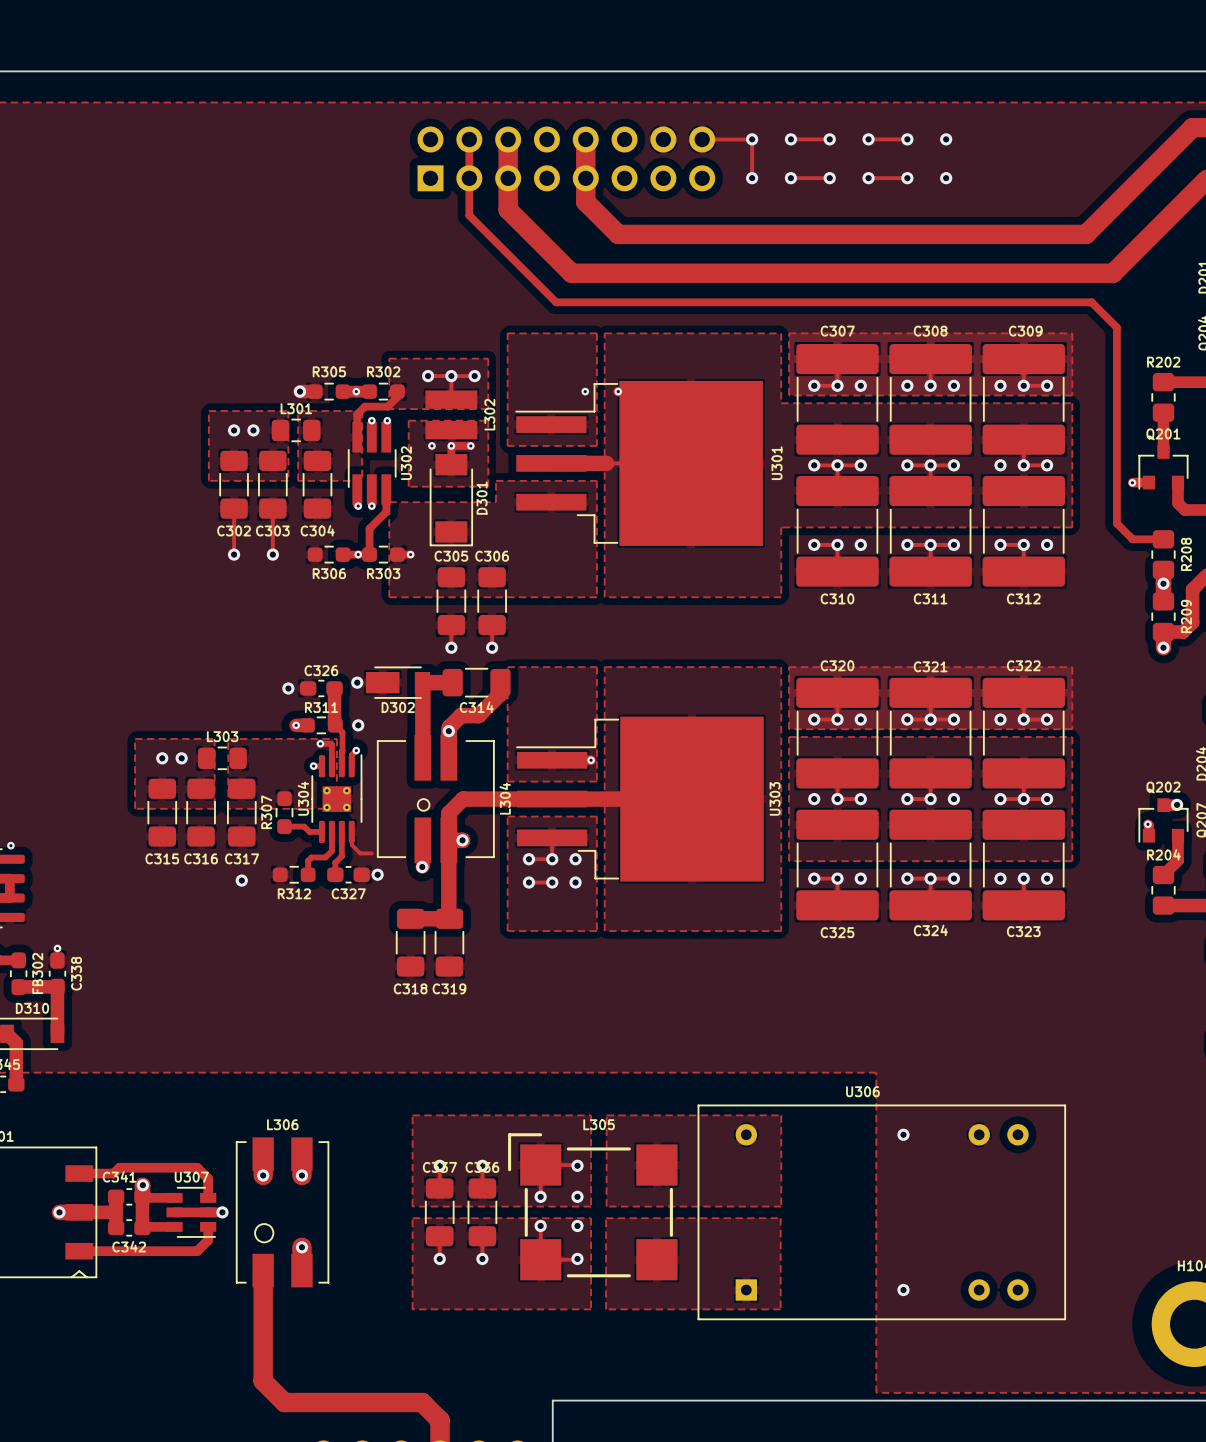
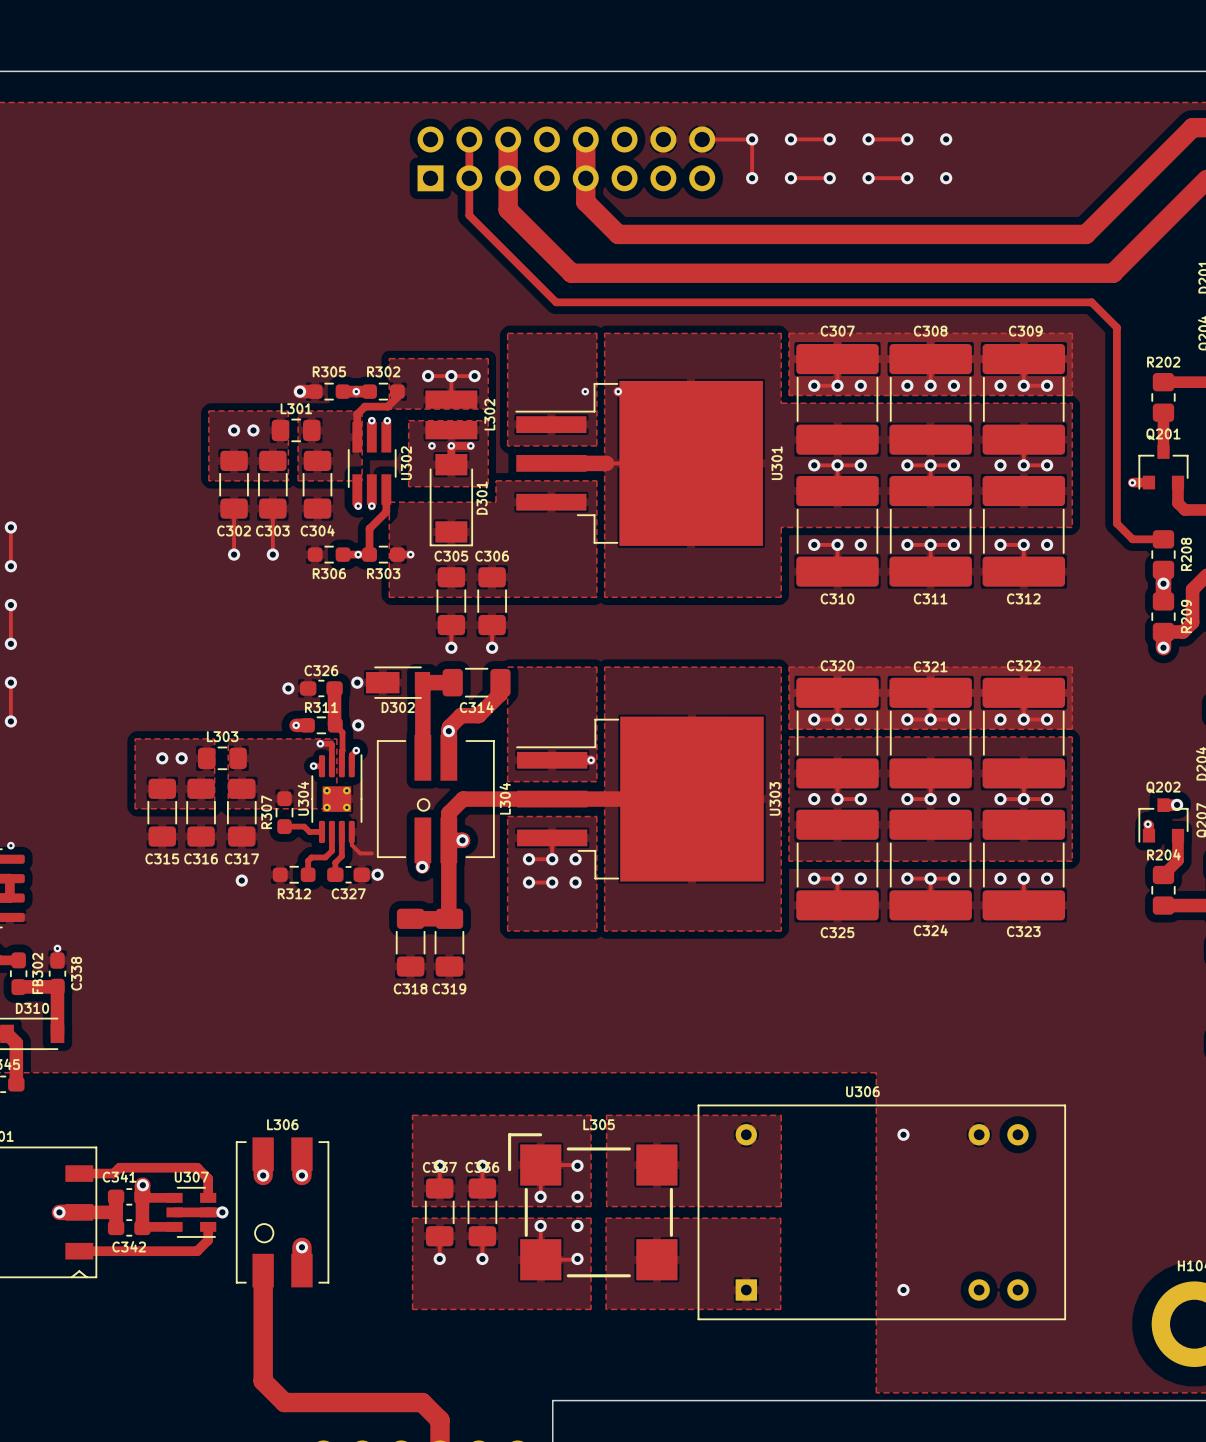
track: none -> (10, 527) (10, 566)
via: none -> (10, 527)
via: none -> (10, 566)
track: none -> (10, 605) (10, 643)
via: none -> (10, 605)
via: none -> (10, 643)
track: none -> (10, 682) (10, 721)
via: none -> (10, 682)
via: none -> (10, 721)

